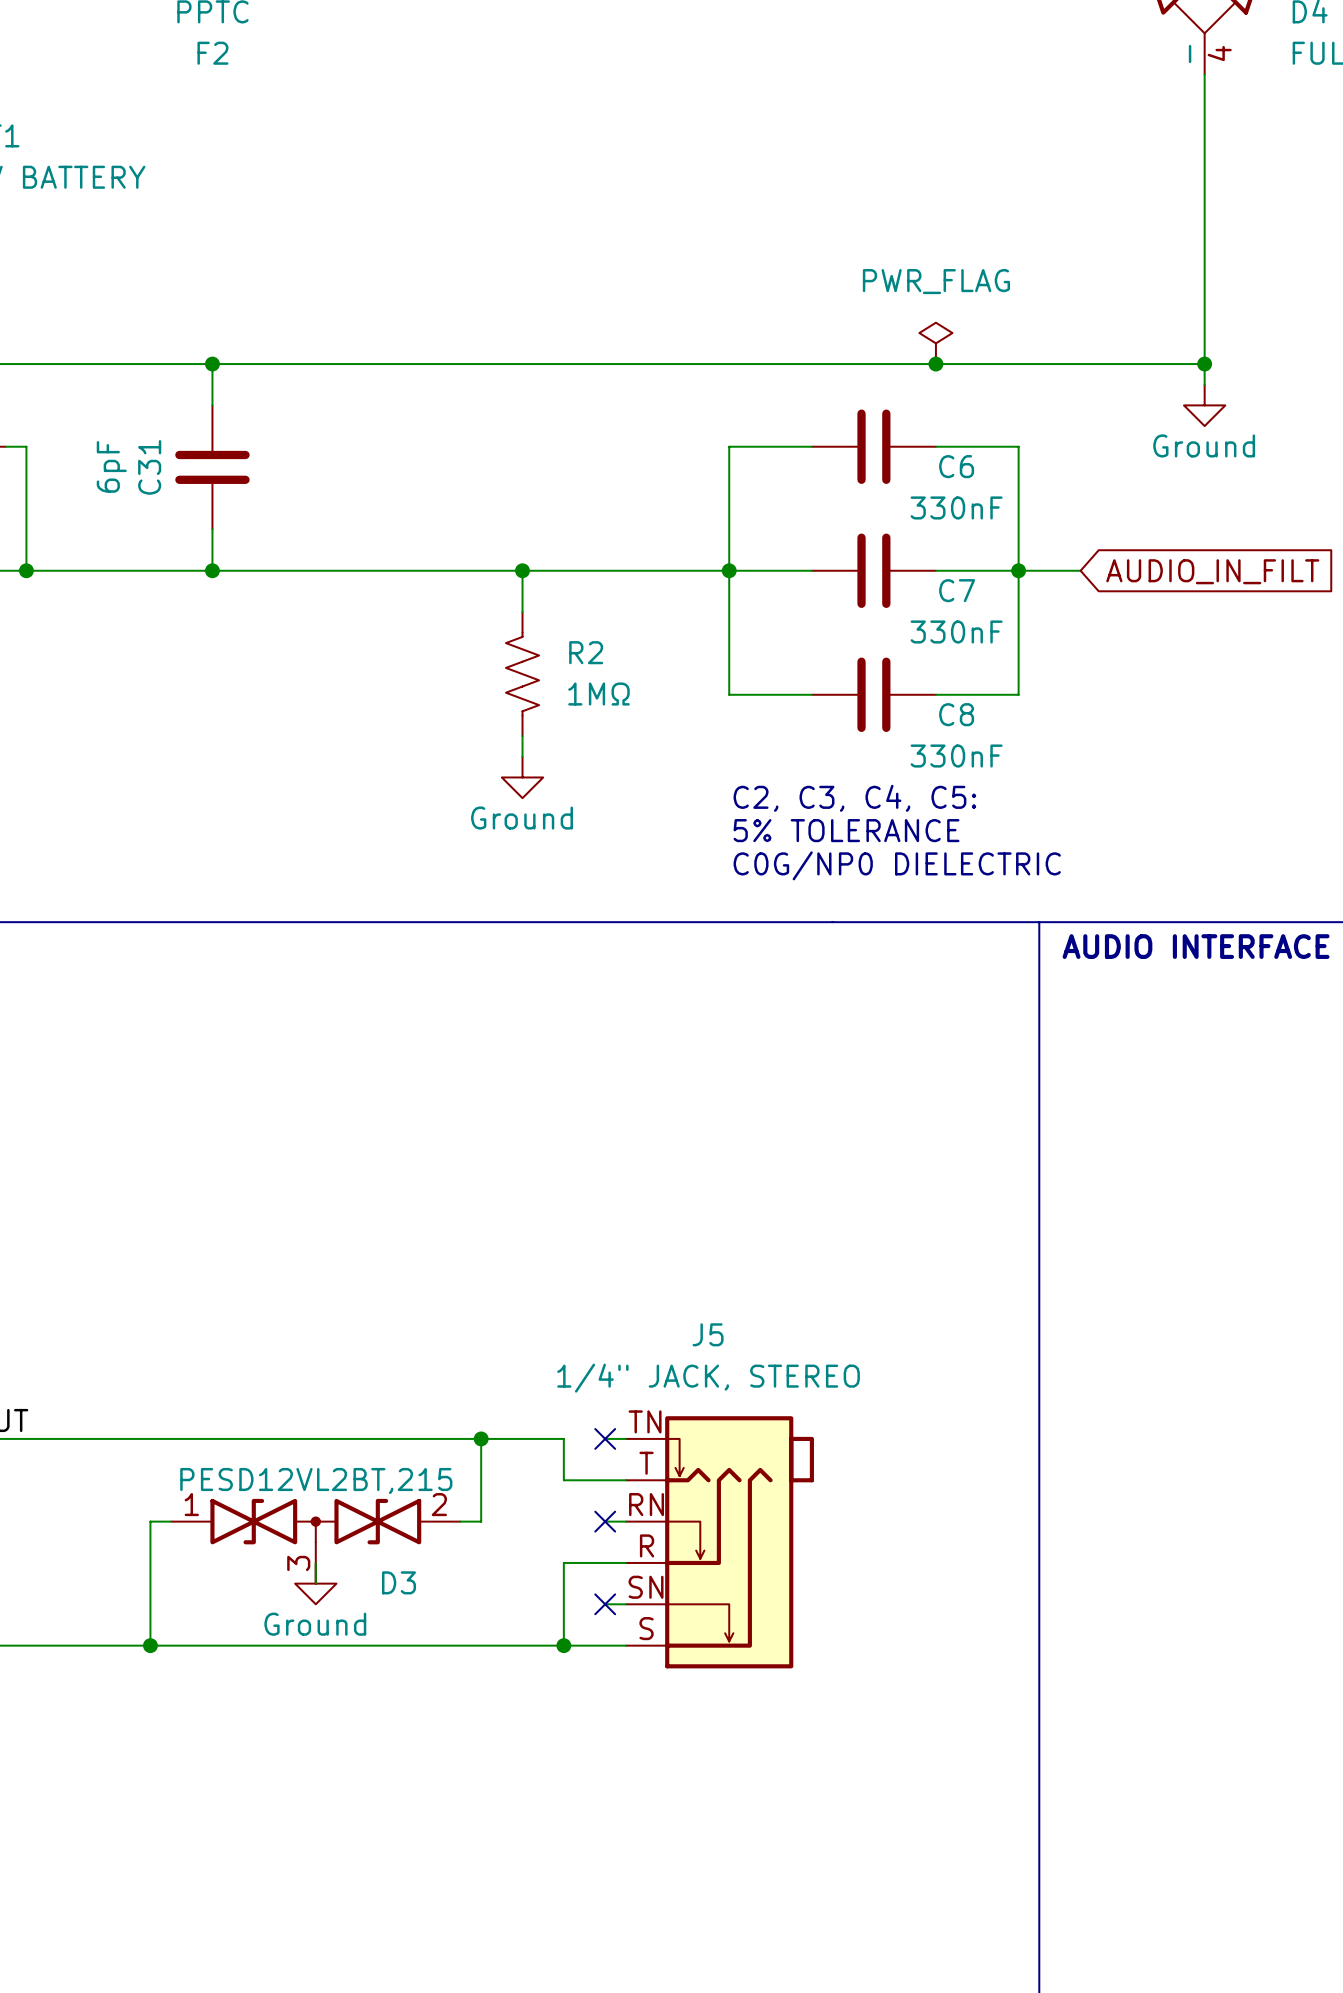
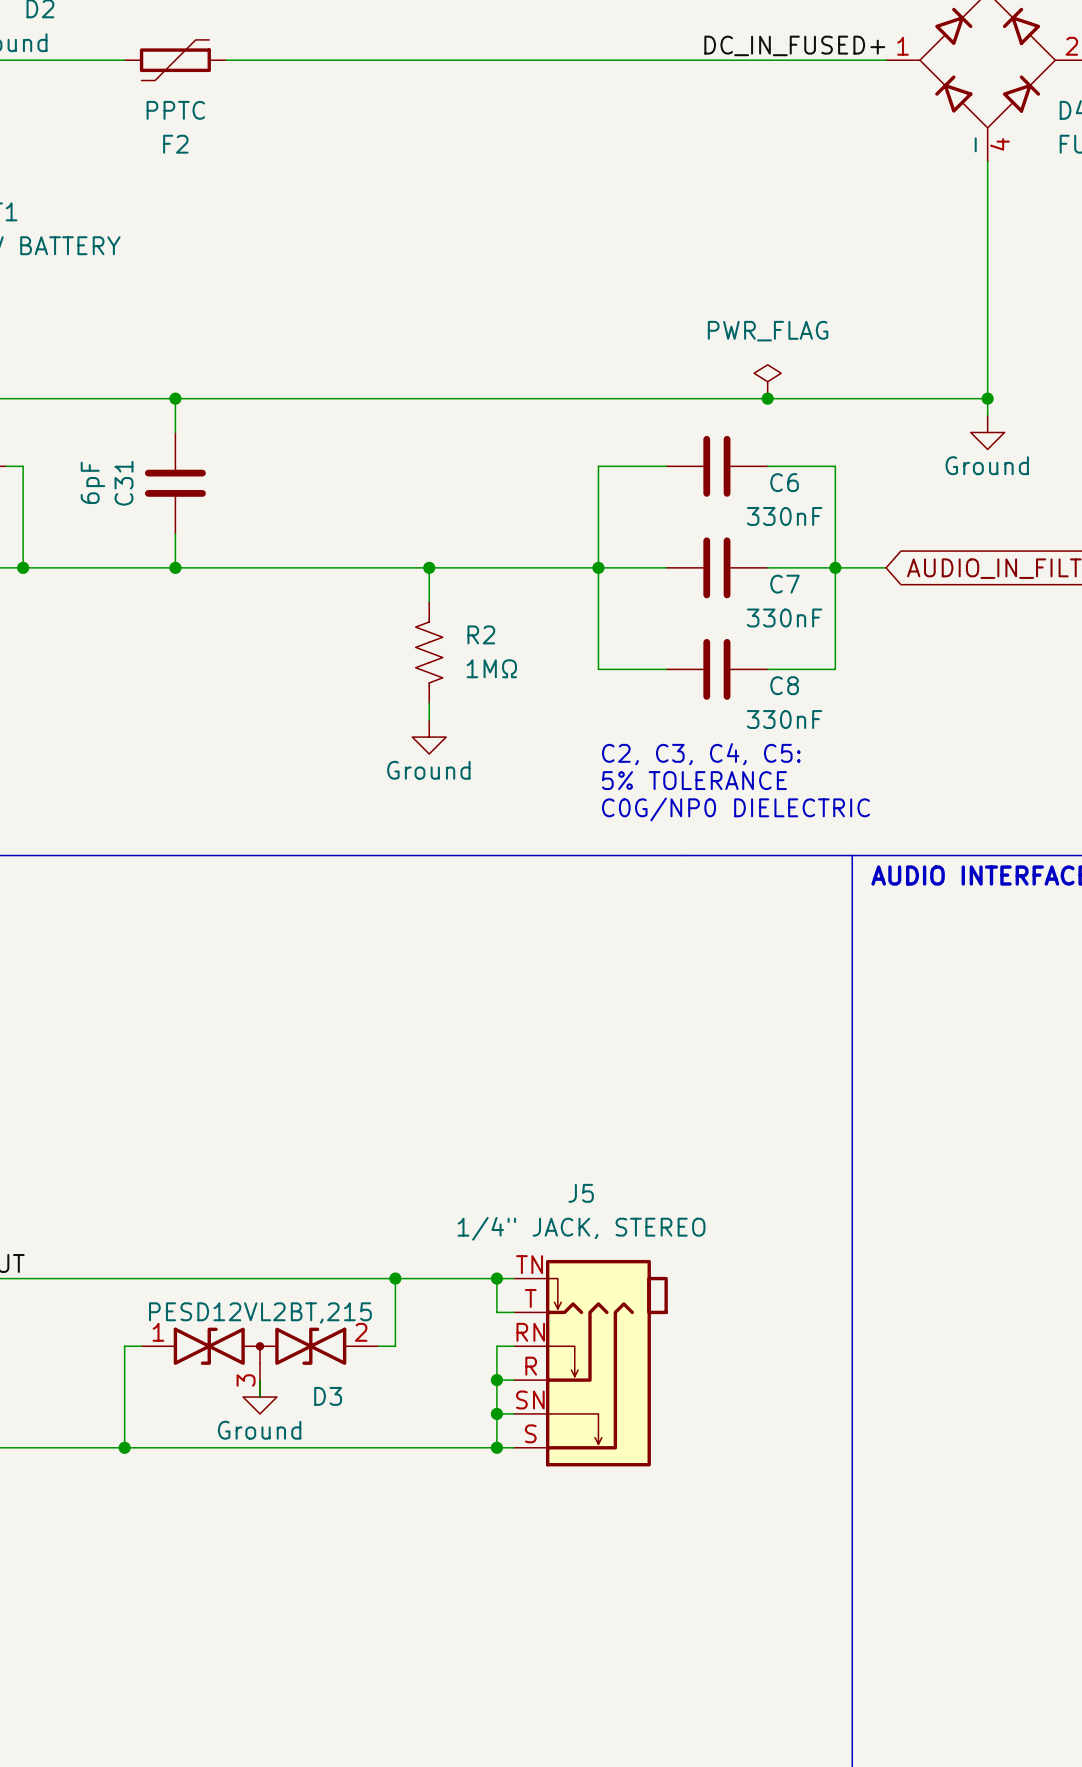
wire: (563, 1438) (563, 1480) (605, 1480) -> (463, 1278) (496, 1278) (496, 1312)
junction: none -> (496, 1278)
no-connect mark: (605, 1438) -> none
wire: none -> (496, 1346) (496, 1447)
no-connect mark: (605, 1521) -> none
wire: (605, 1562) (563, 1562) (563, 1645) -> none
junction: none -> (496, 1380)
junction: none -> (496, 1413)
no-connect mark: (605, 1604) -> none
junction: (563, 1645) -> none
junction: none -> (496, 1447)

